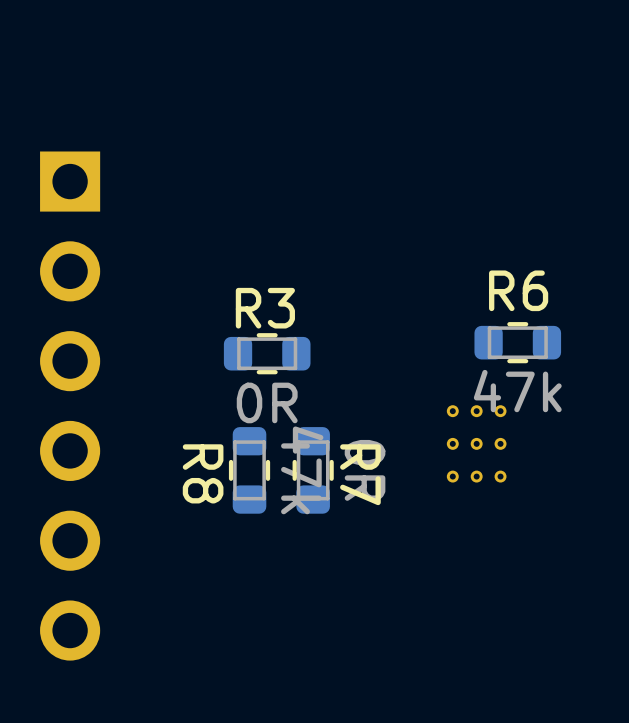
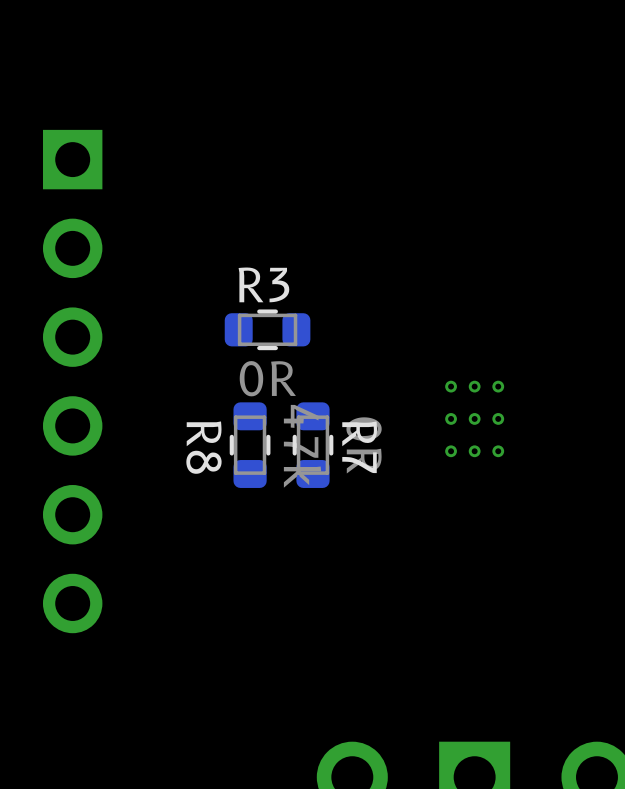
R6: 47k (517, 342) -> none

